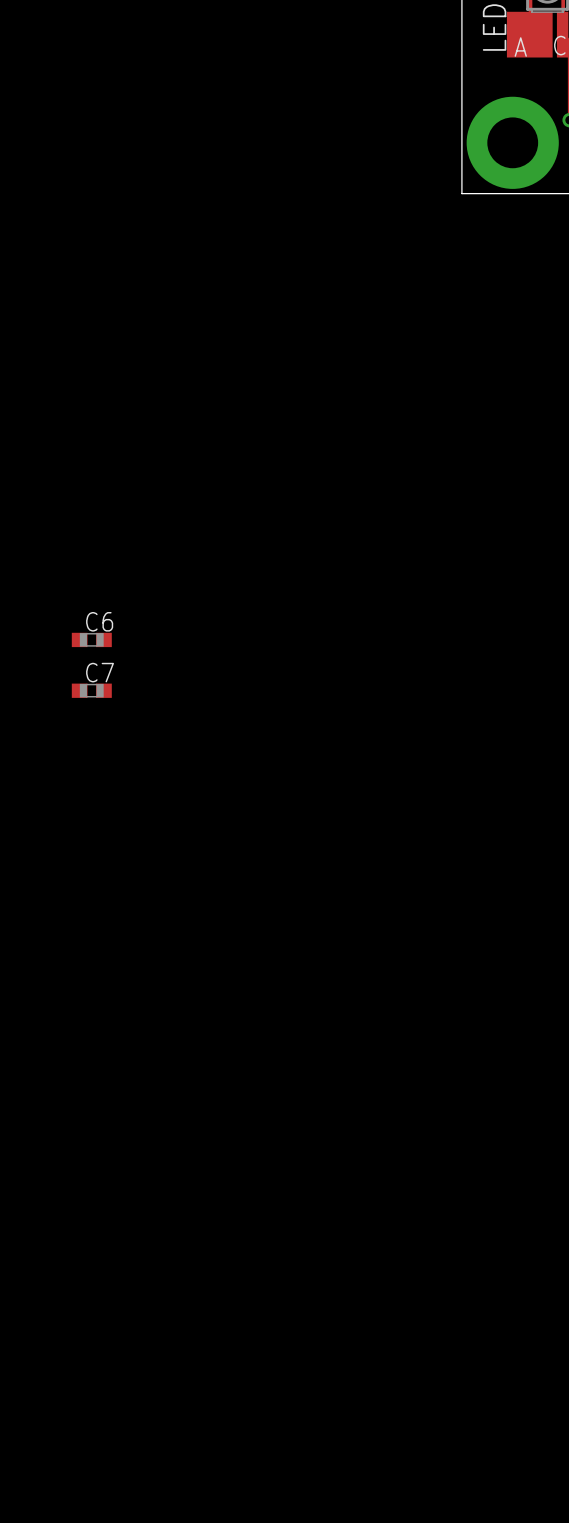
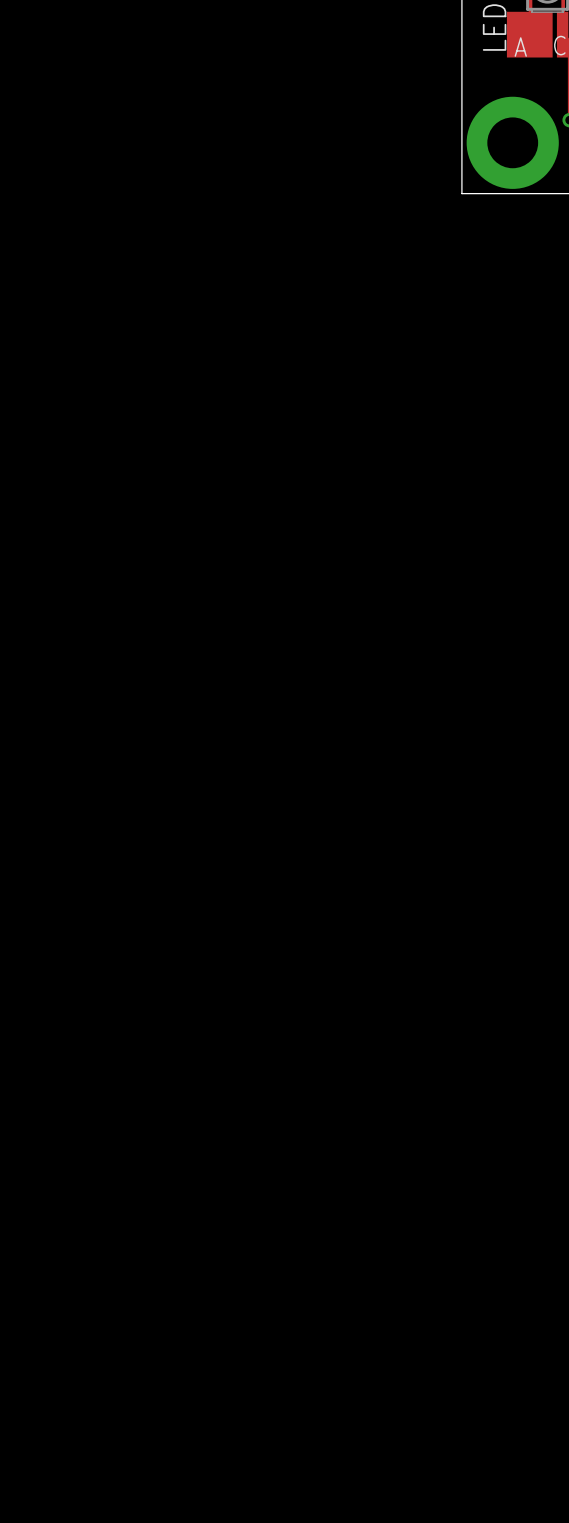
C6: (91, 639) -> none
C7: (91, 690) -> none

